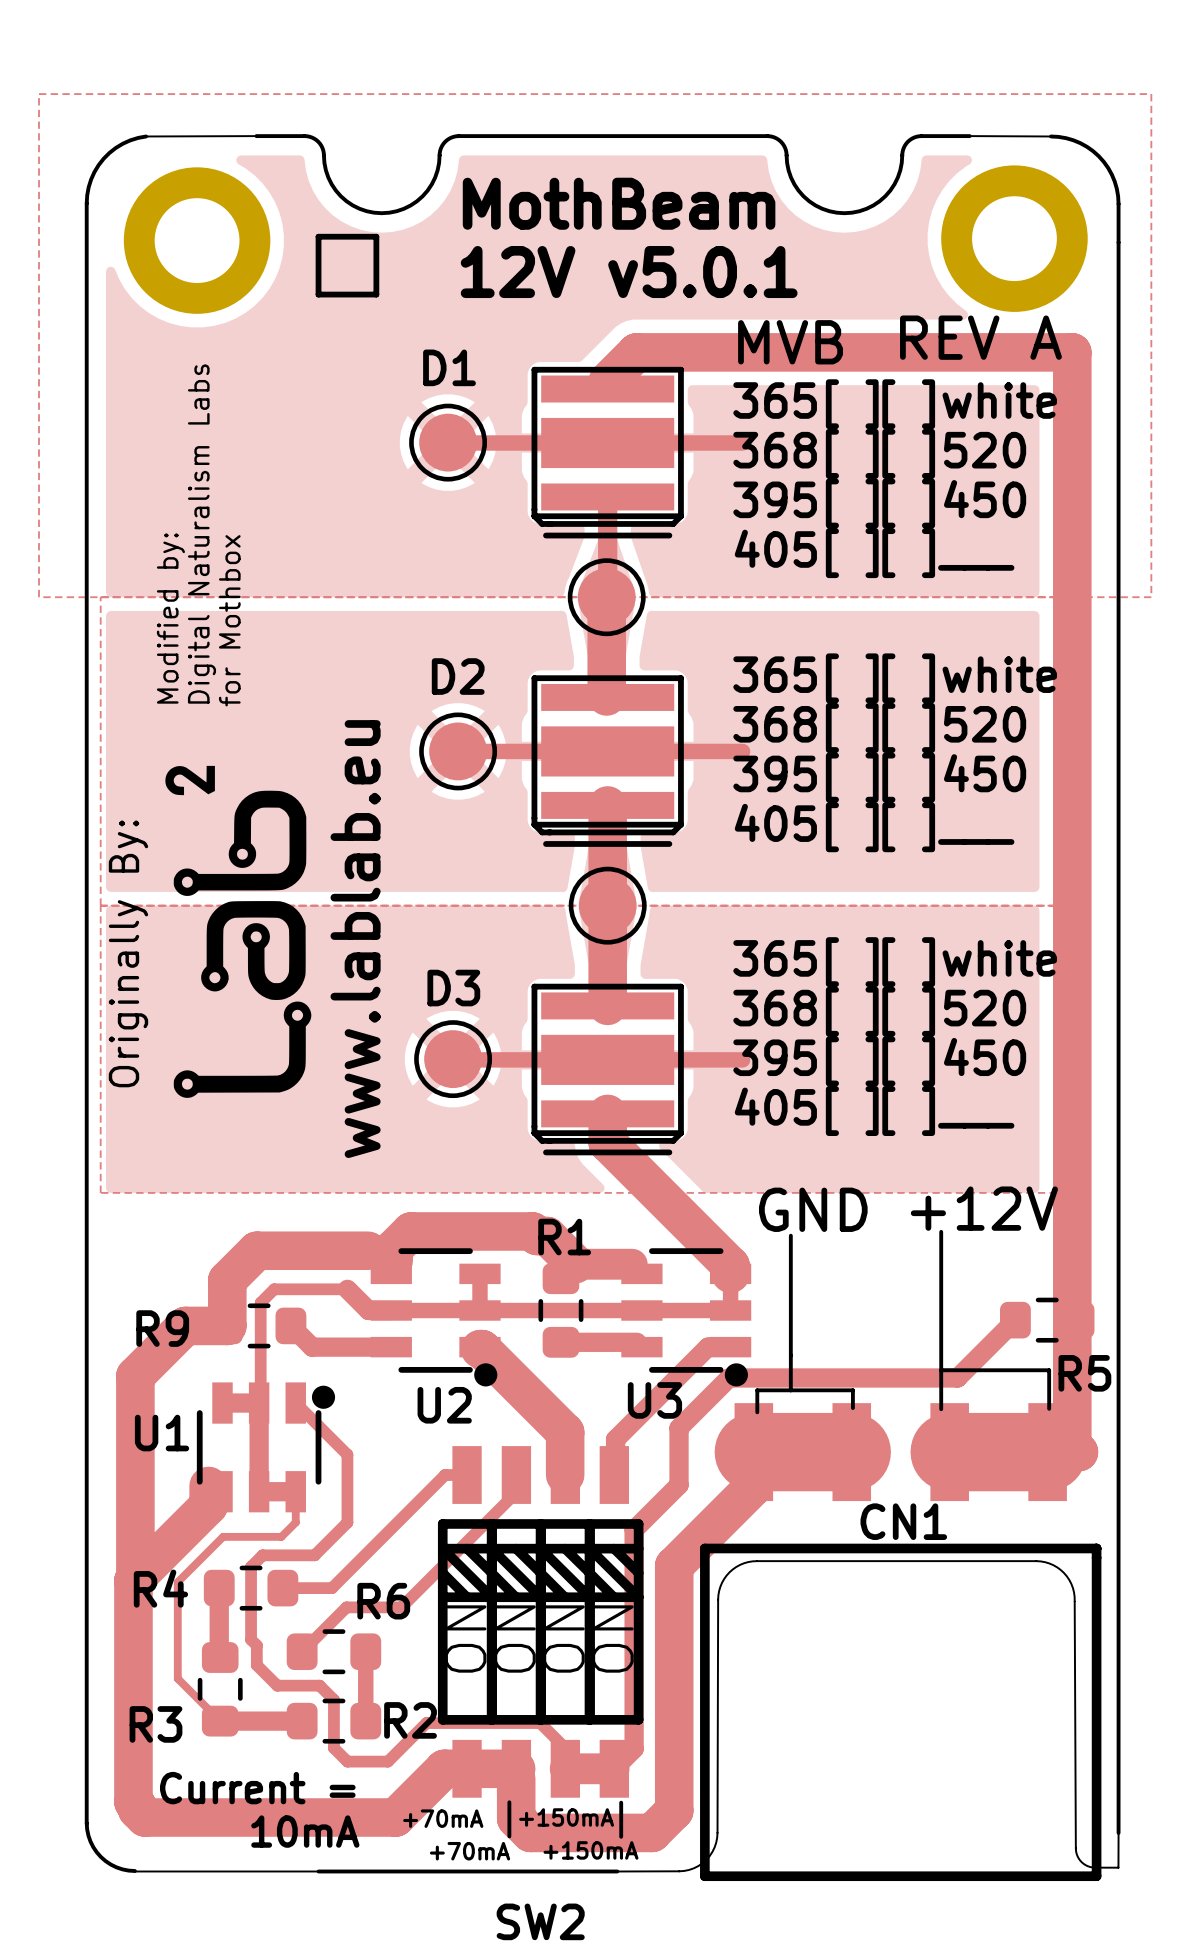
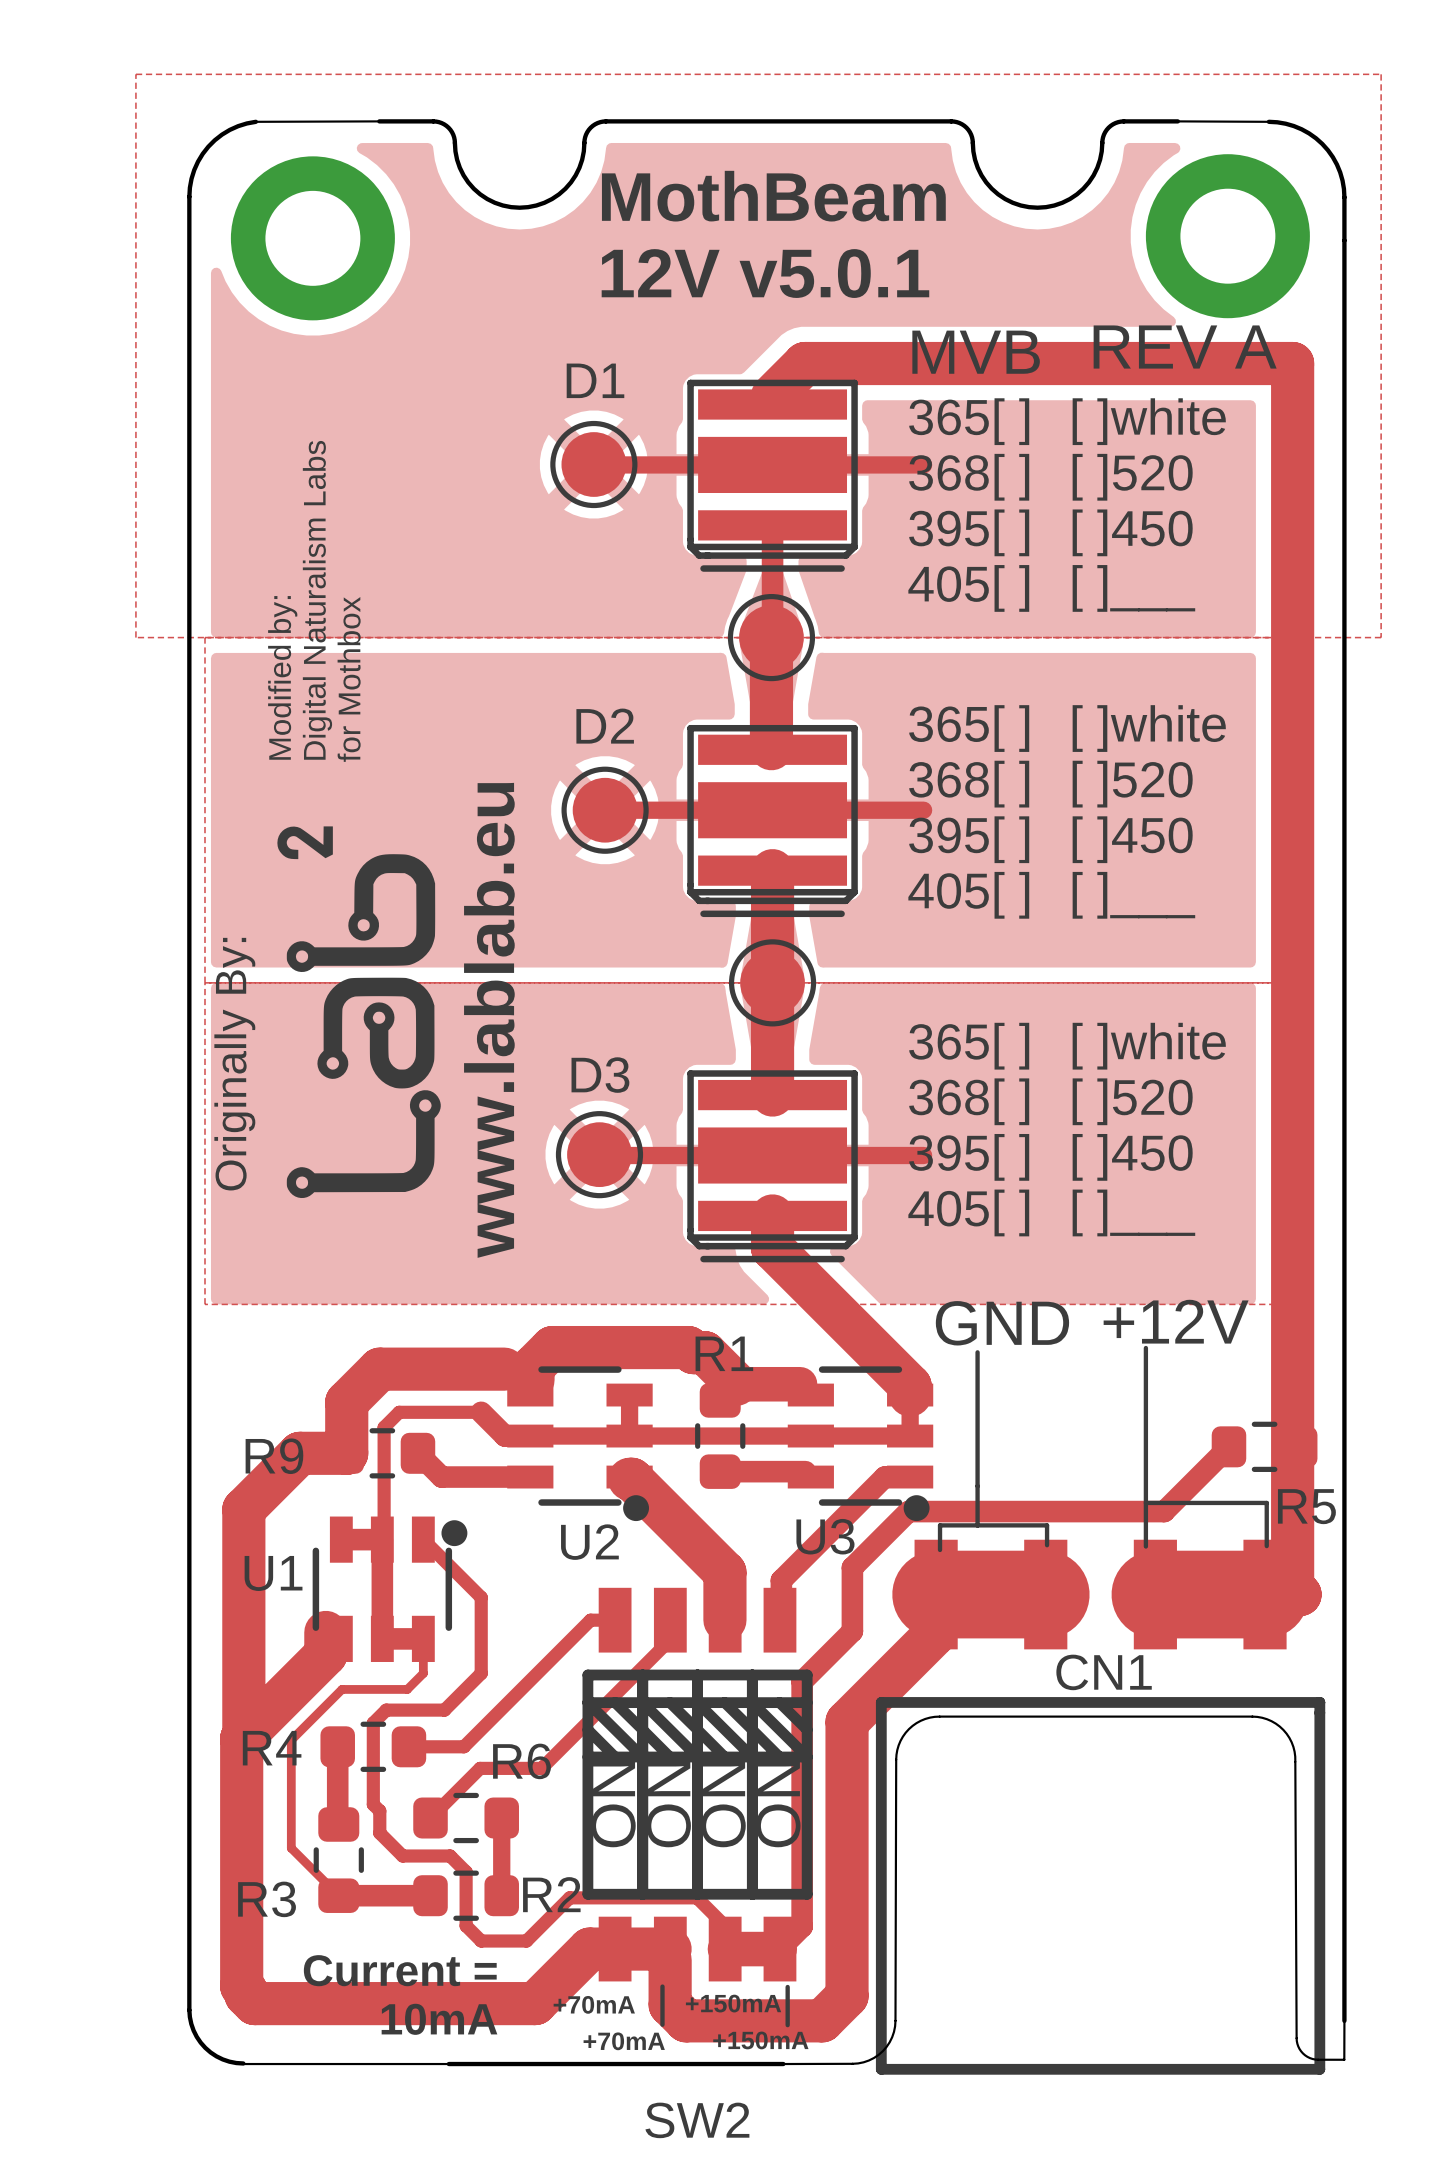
line: (318, 236) (376, 236) (376, 294) (318, 294) (318, 236) -> none

